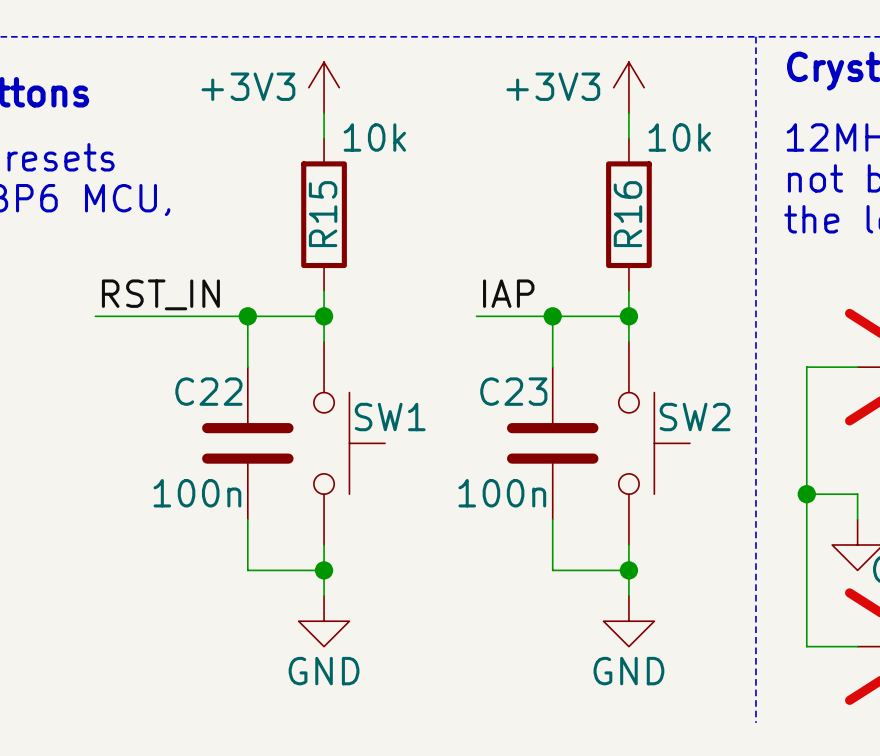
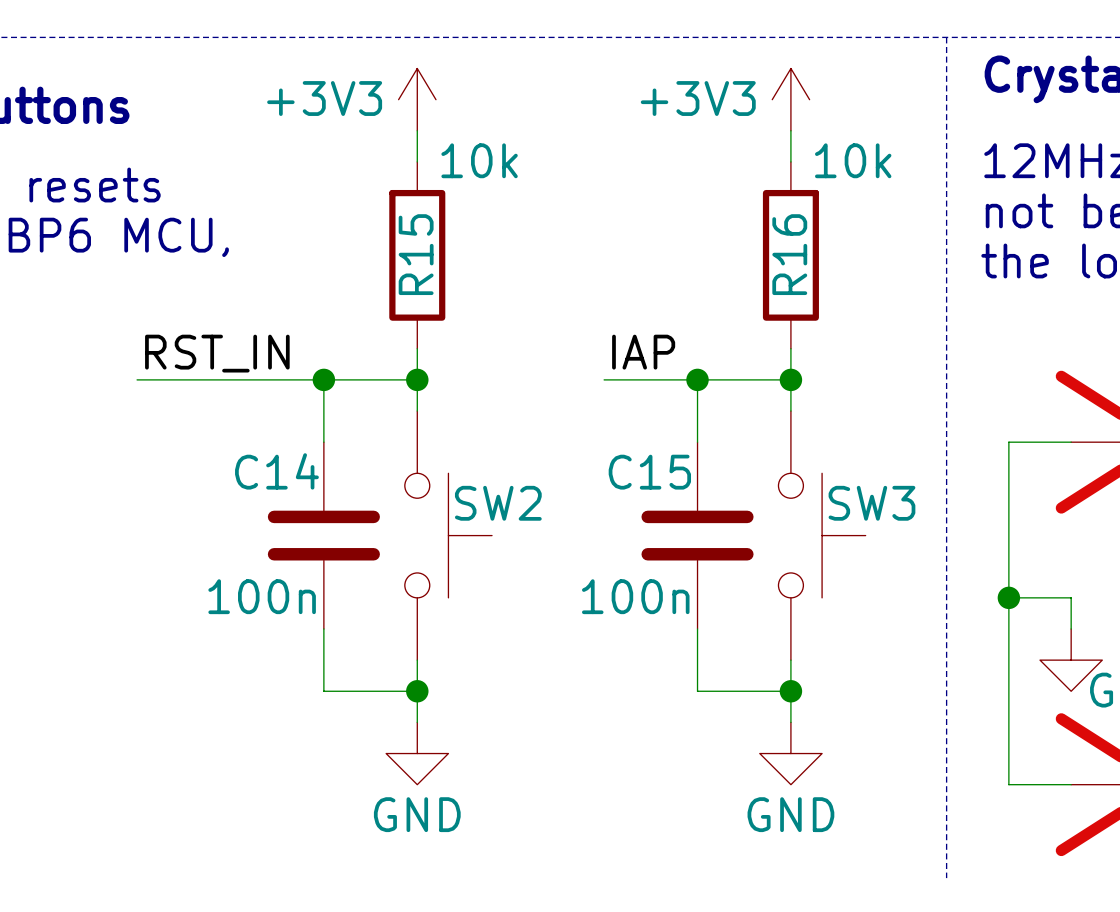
C22 name: C22 (208, 391) -> C14 (276, 471)
C23 name: C23 (513, 391) -> C15 (649, 472)
SW1 name: SW1 (390, 417) -> SW2 (498, 503)
SW2 name: SW2 (695, 417) -> SW3 (871, 503)

